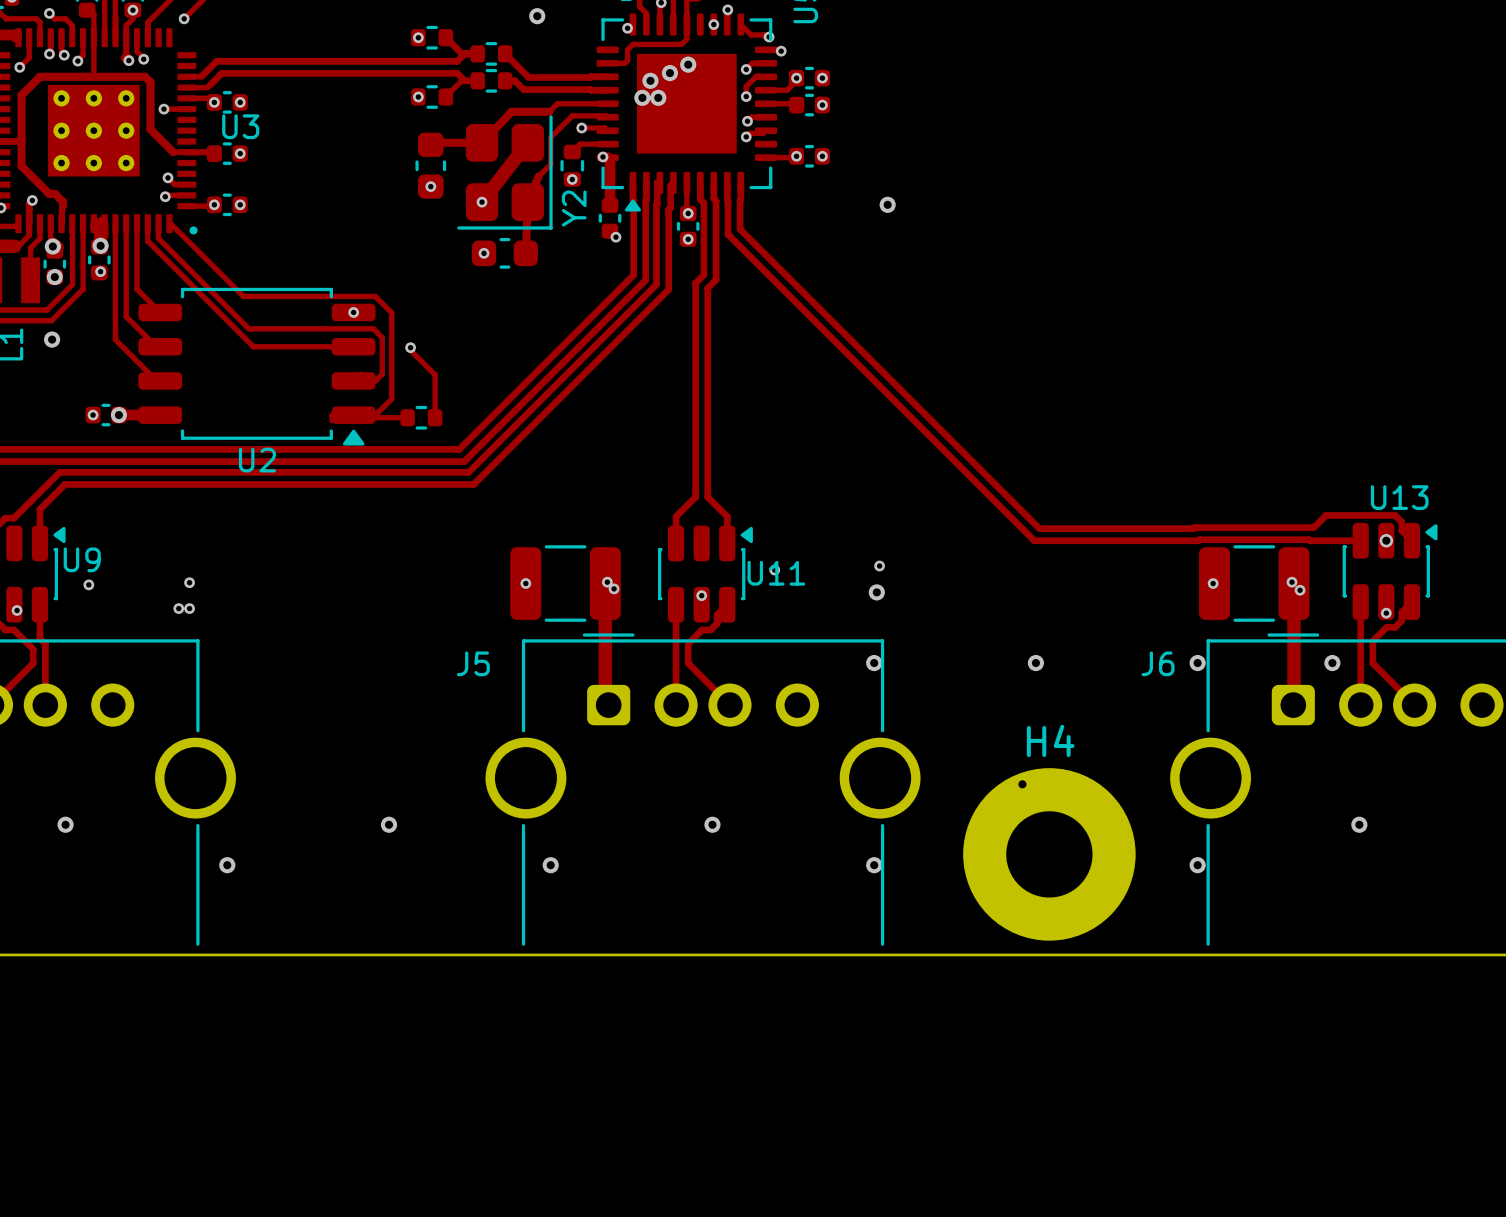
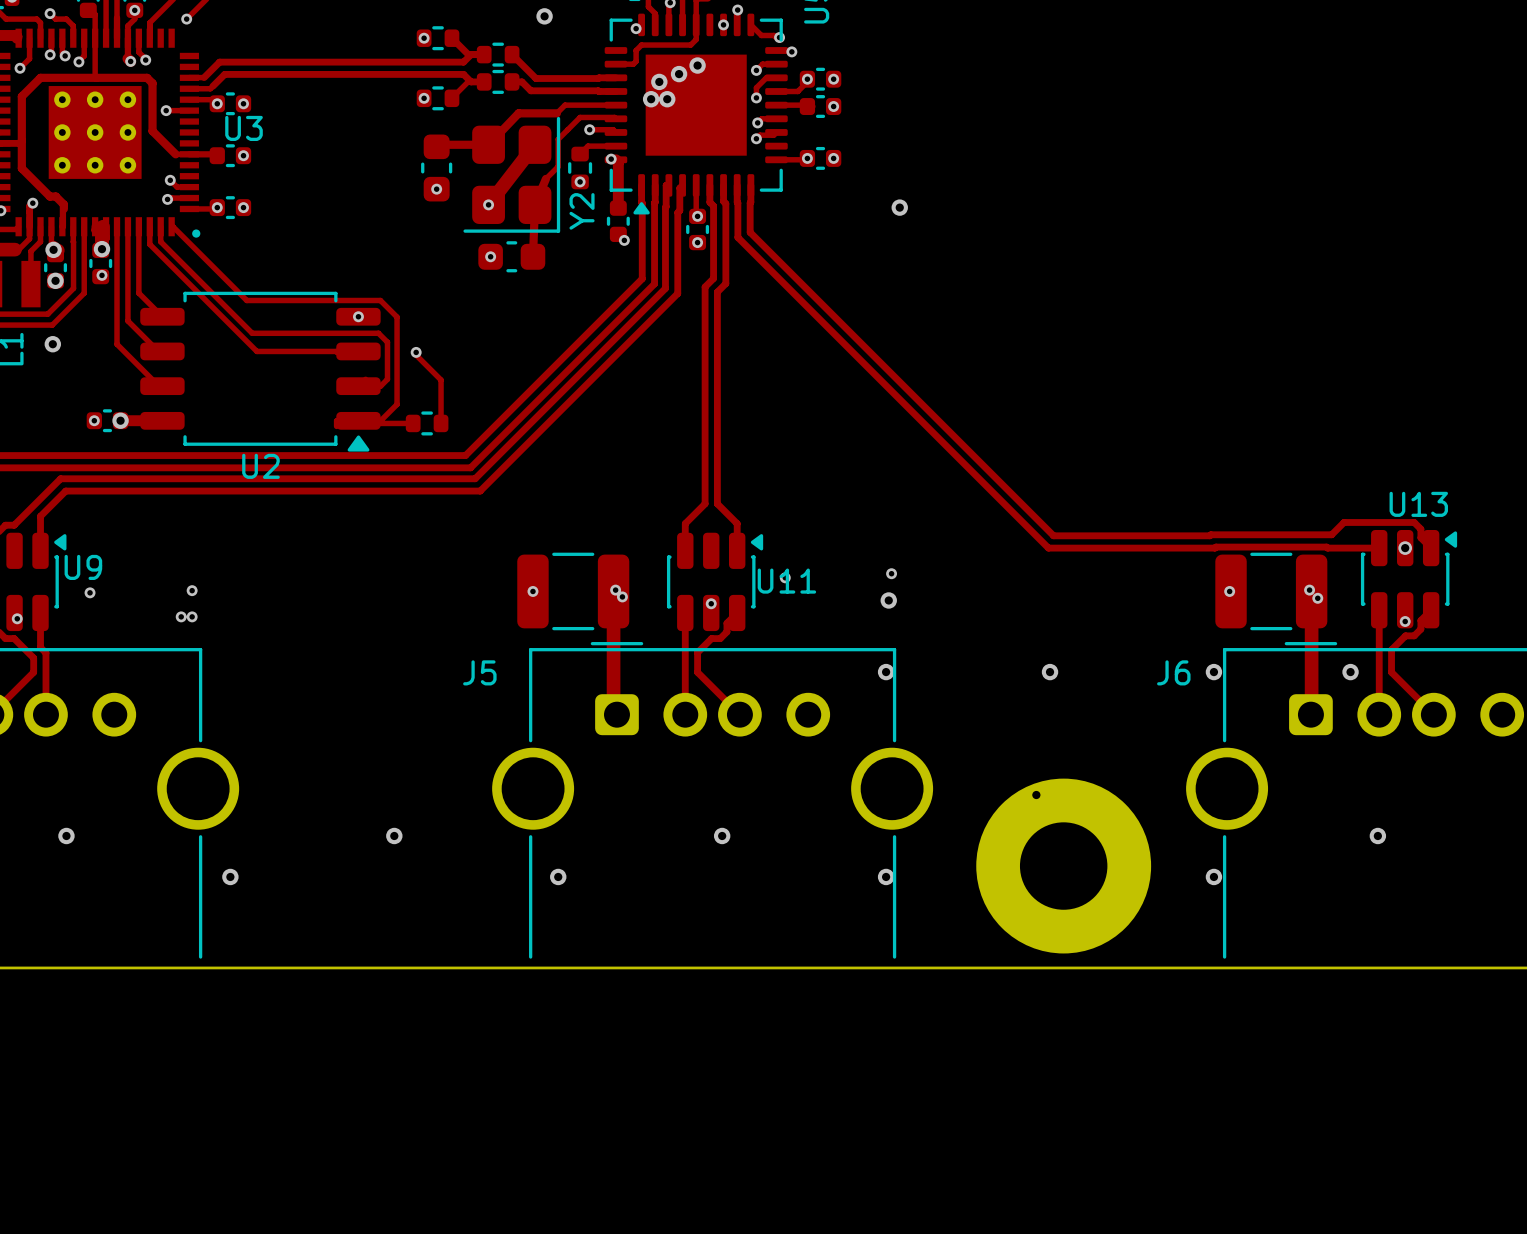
H4 name: H4 (1050, 740) -> none

